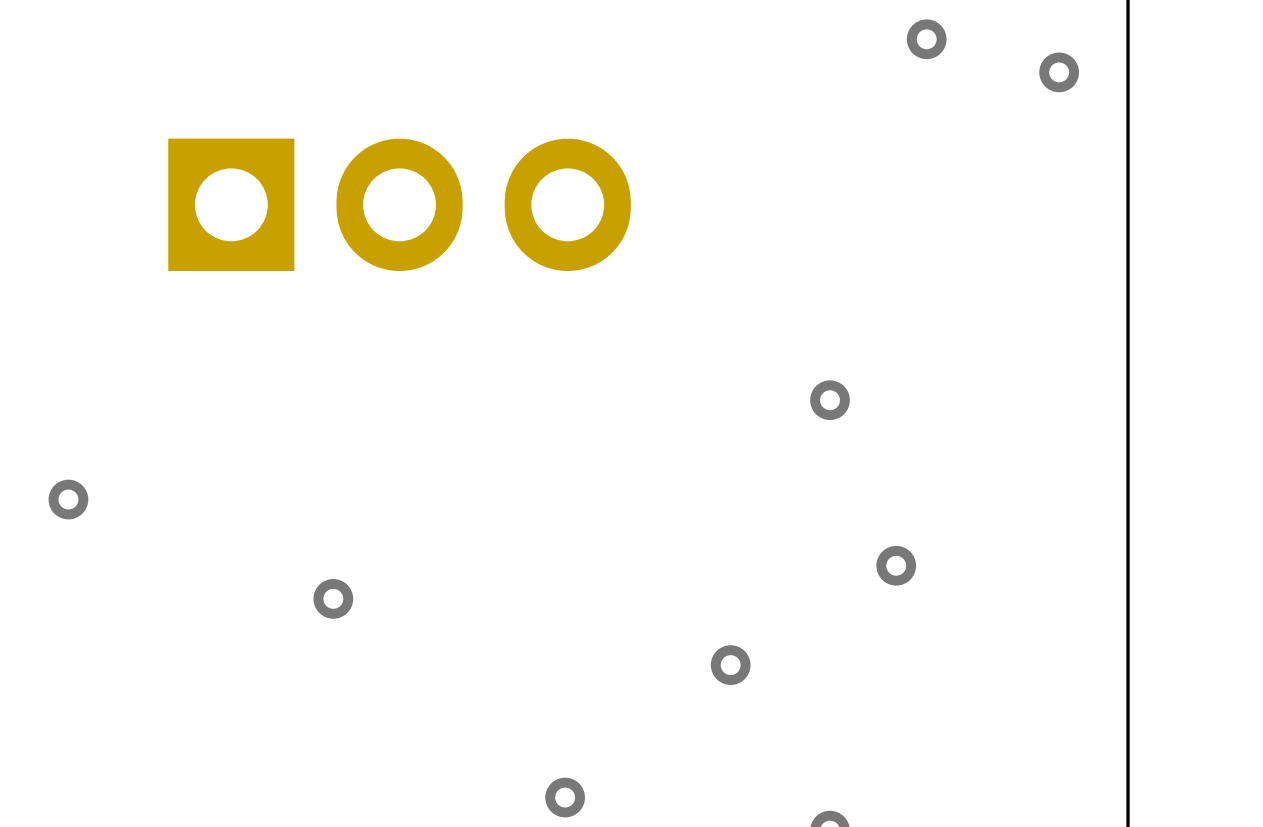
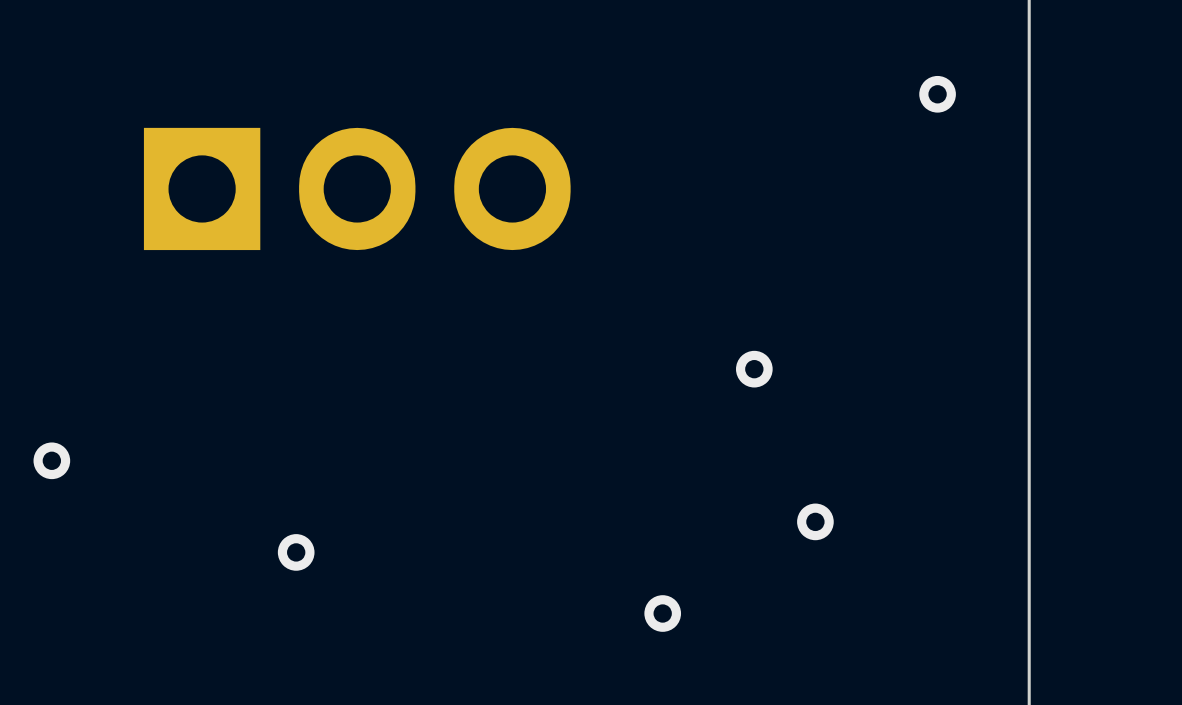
via: (926, 39) -> none
via position: (1059, 72) -> (937, 94)

